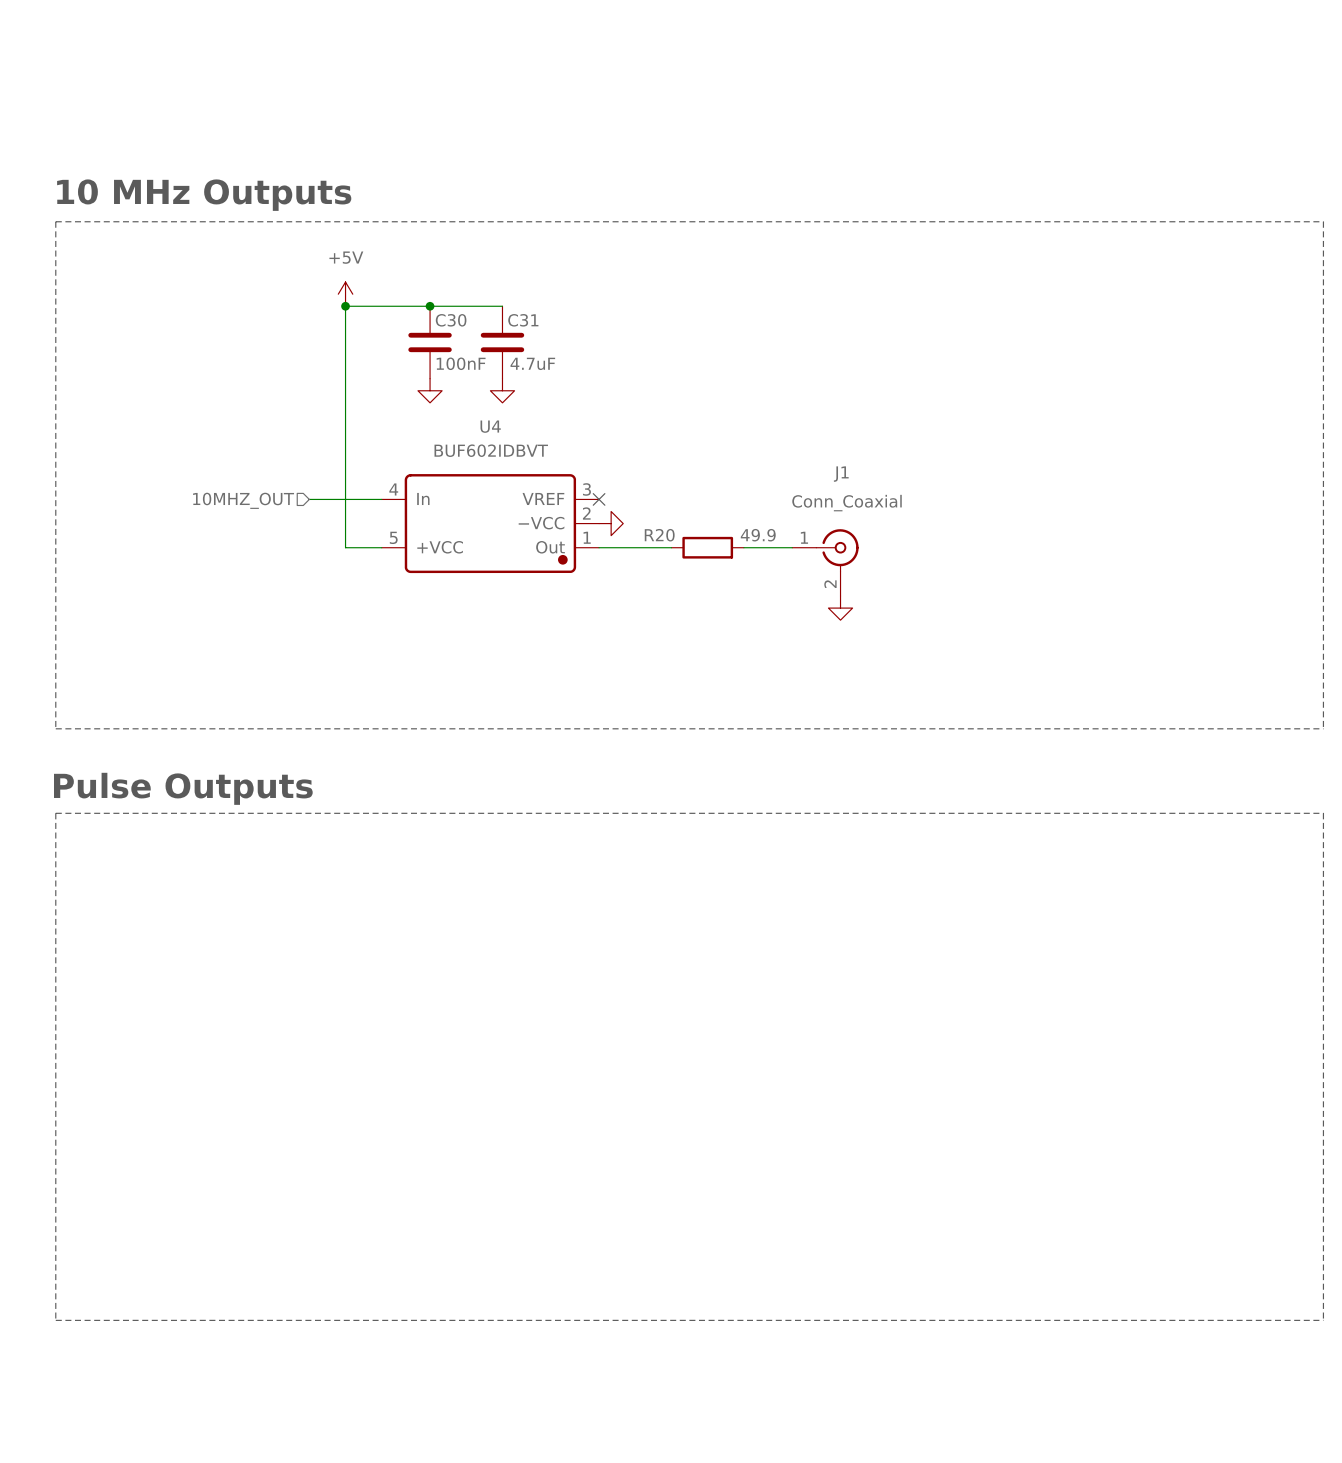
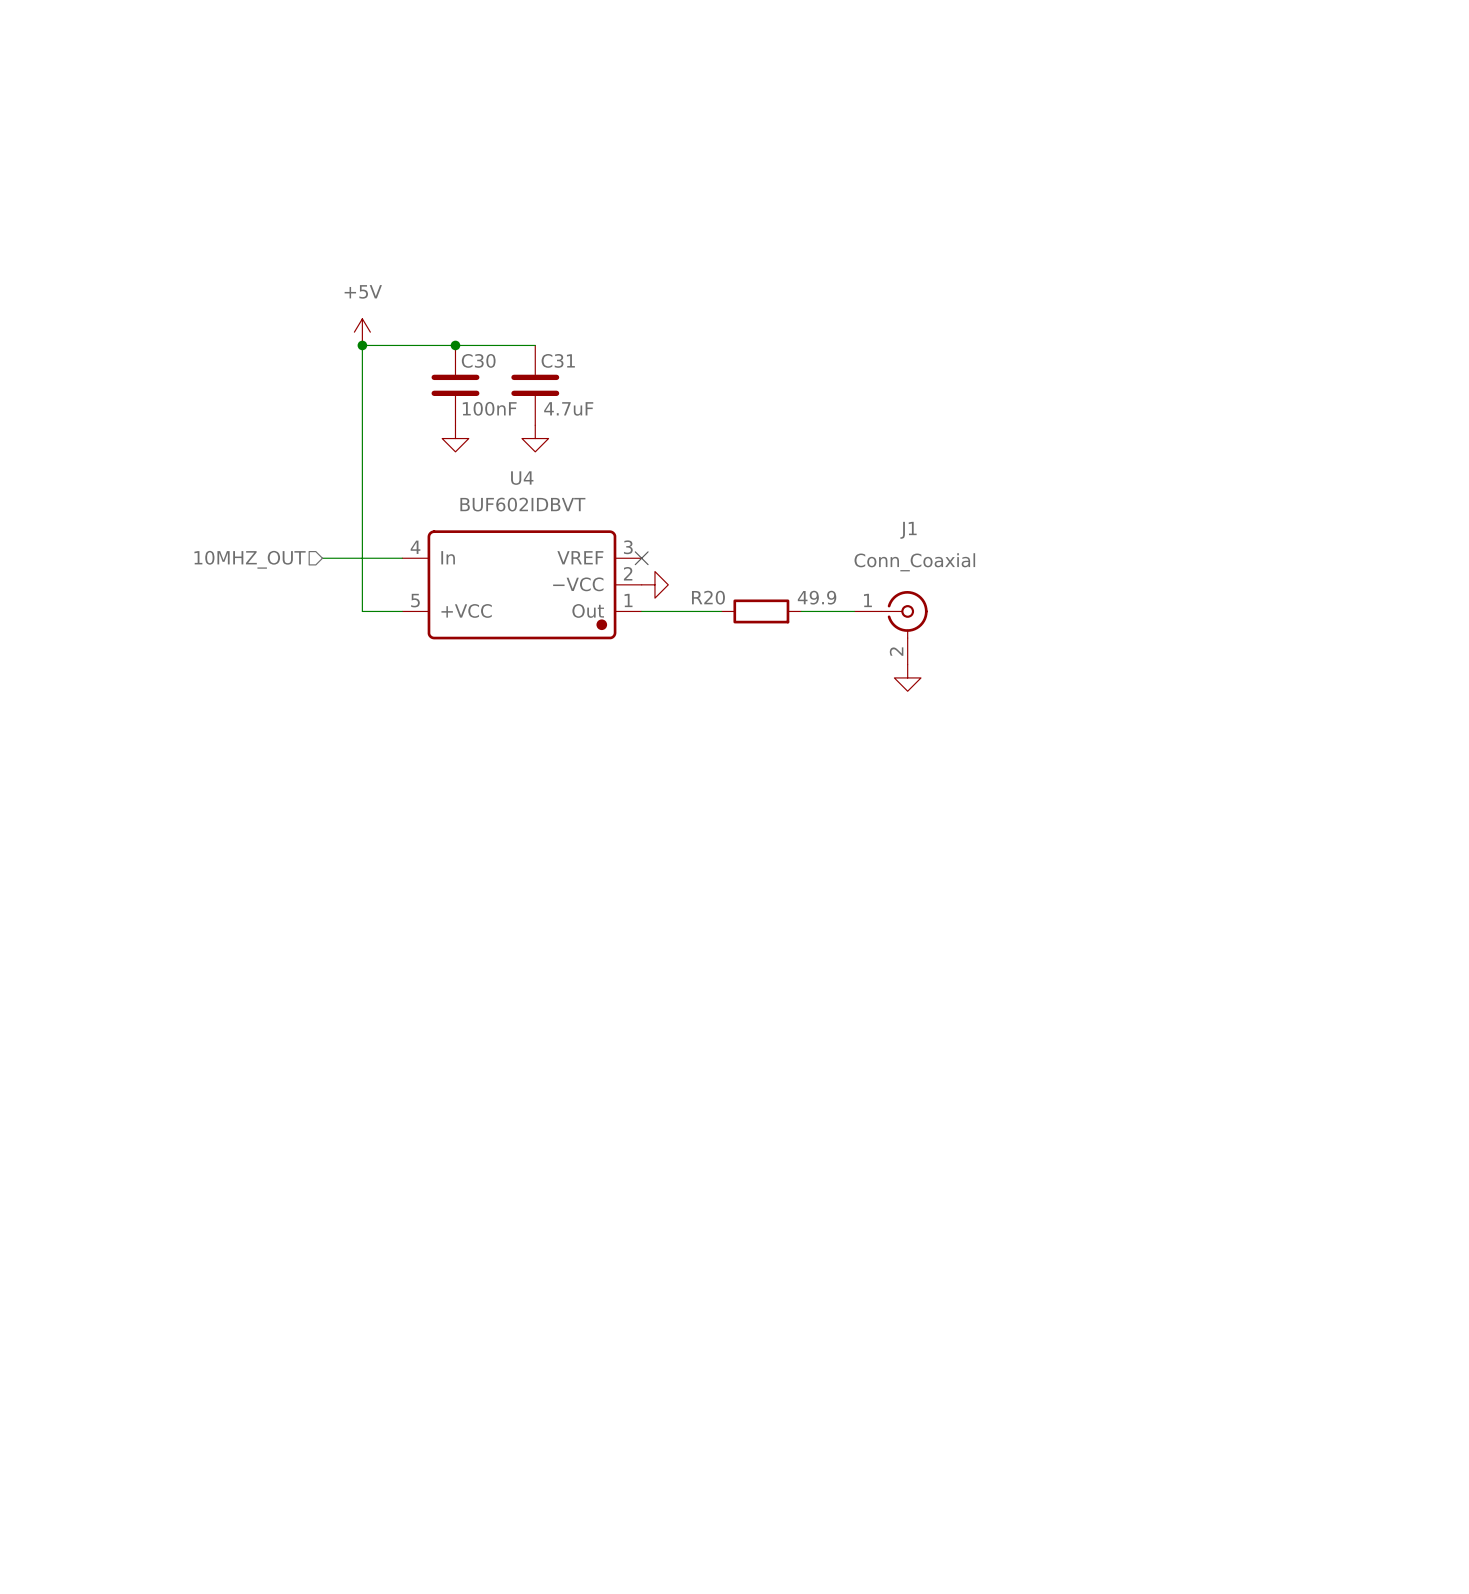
text: 10 MHz Outputs (204, 195) -> none
line: (55, 221) (55, 728) (1323, 728) (1323, 221) (55, 221) -> none
text: Pulse Outputs (183, 788) -> none
line: (55, 813) (55, 1320) (1323, 1320) (1323, 813) (55, 813) -> none

